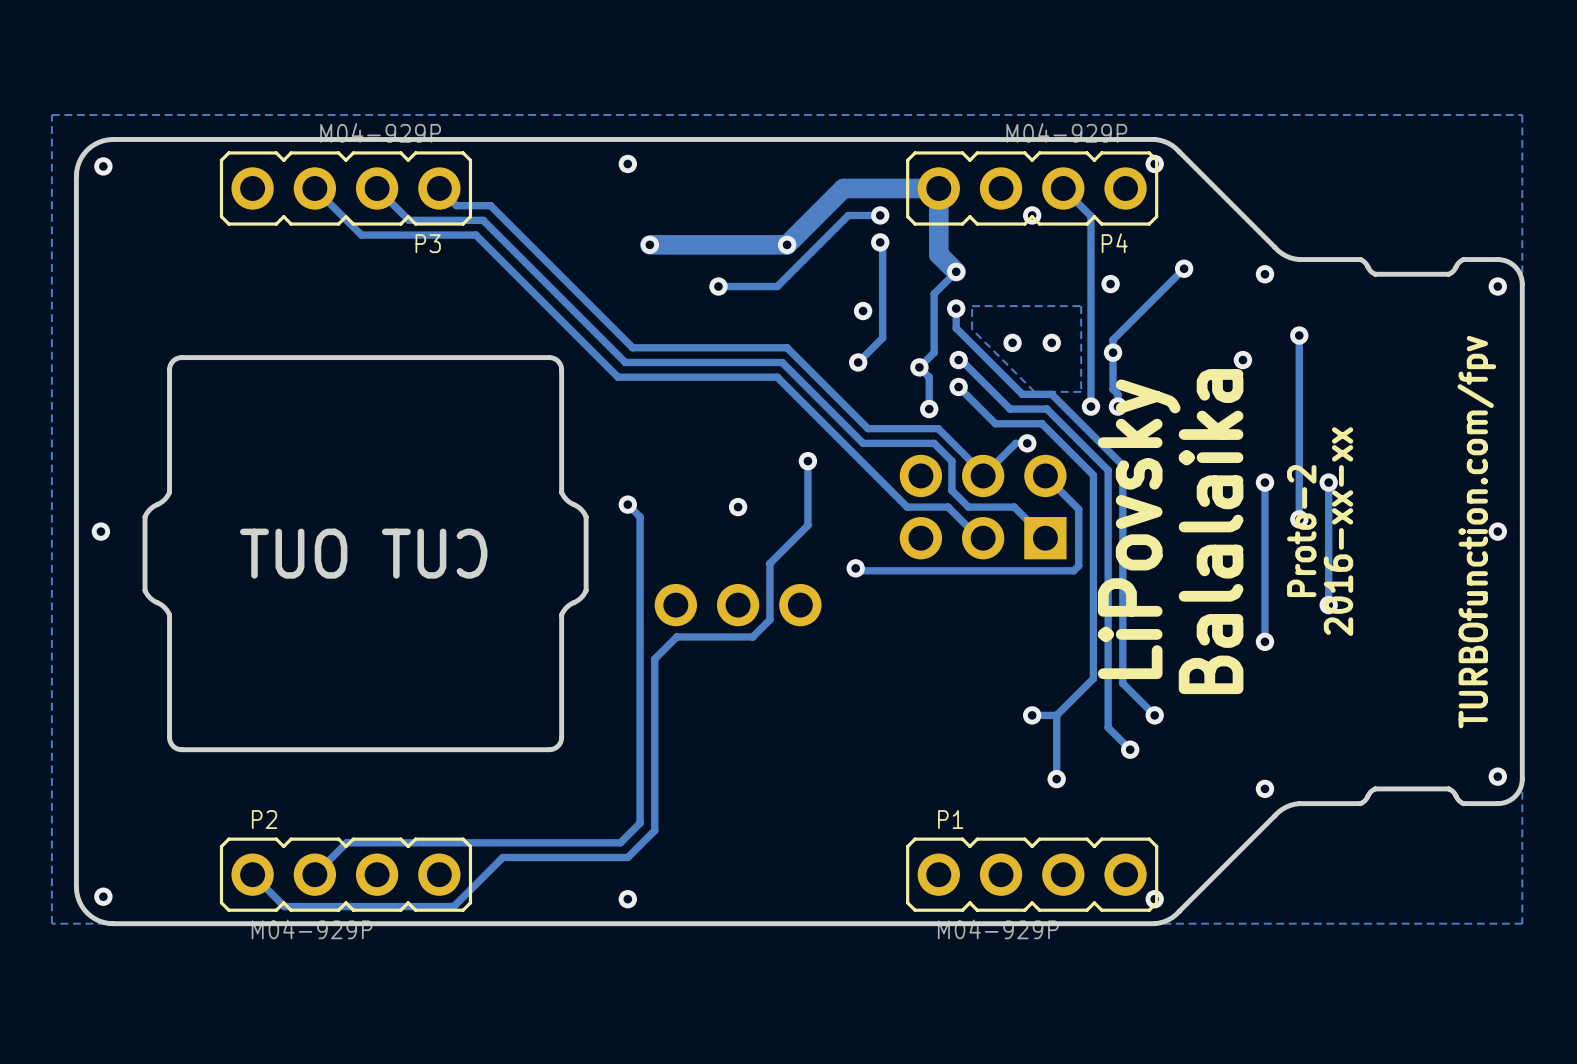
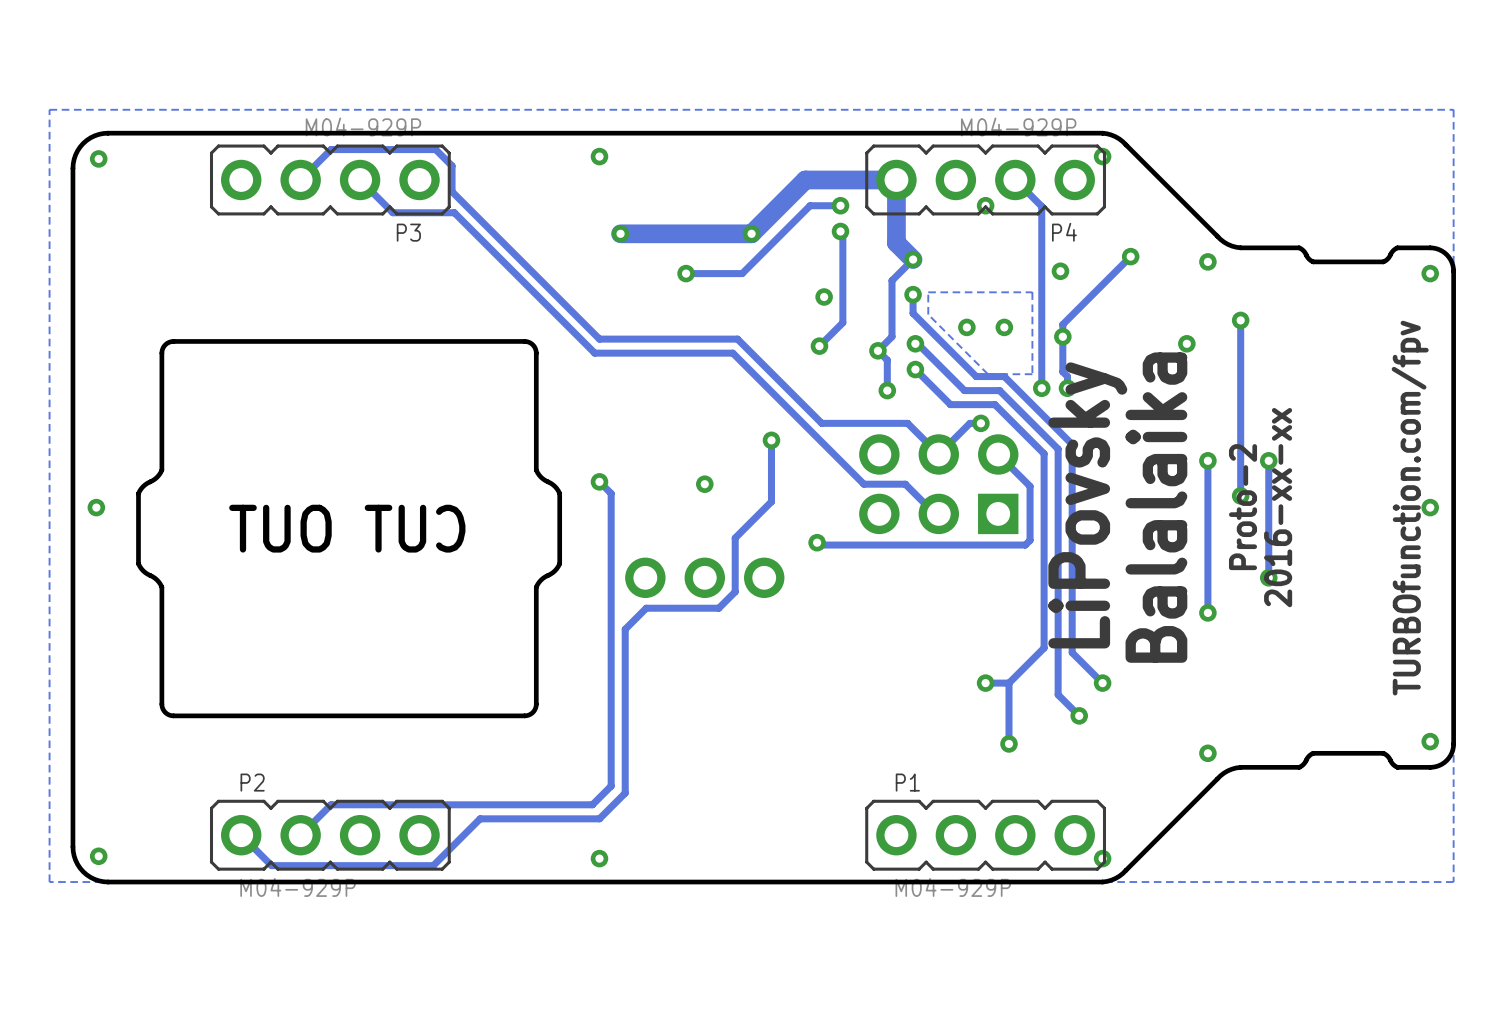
track: (314, 188) (361, 235) (475, 235) (618, 377) (777, 377) (907, 507) -> (300, 179) (331, 149) (435, 149) (452, 165) (452, 191) (599, 339) (737, 339) (821, 423) (824, 423)
track: (439, 188) (456, 205) (490, 205) (632, 347) (787, 347) (867, 428) (938, 428) (983, 473) (983, 475) -> none
track: (408, 220) (483, 220) (625, 362) (782, 362) (863, 443) -> (390, 210) (392, 212) (454, 212) (594, 353) (732, 353) (863, 484) (866, 484)
track: (934, 443) (951, 461) (951, 490) (968, 507) (1014, 507) (1045, 538) -> (891, 423) (907, 423) (938, 454)

